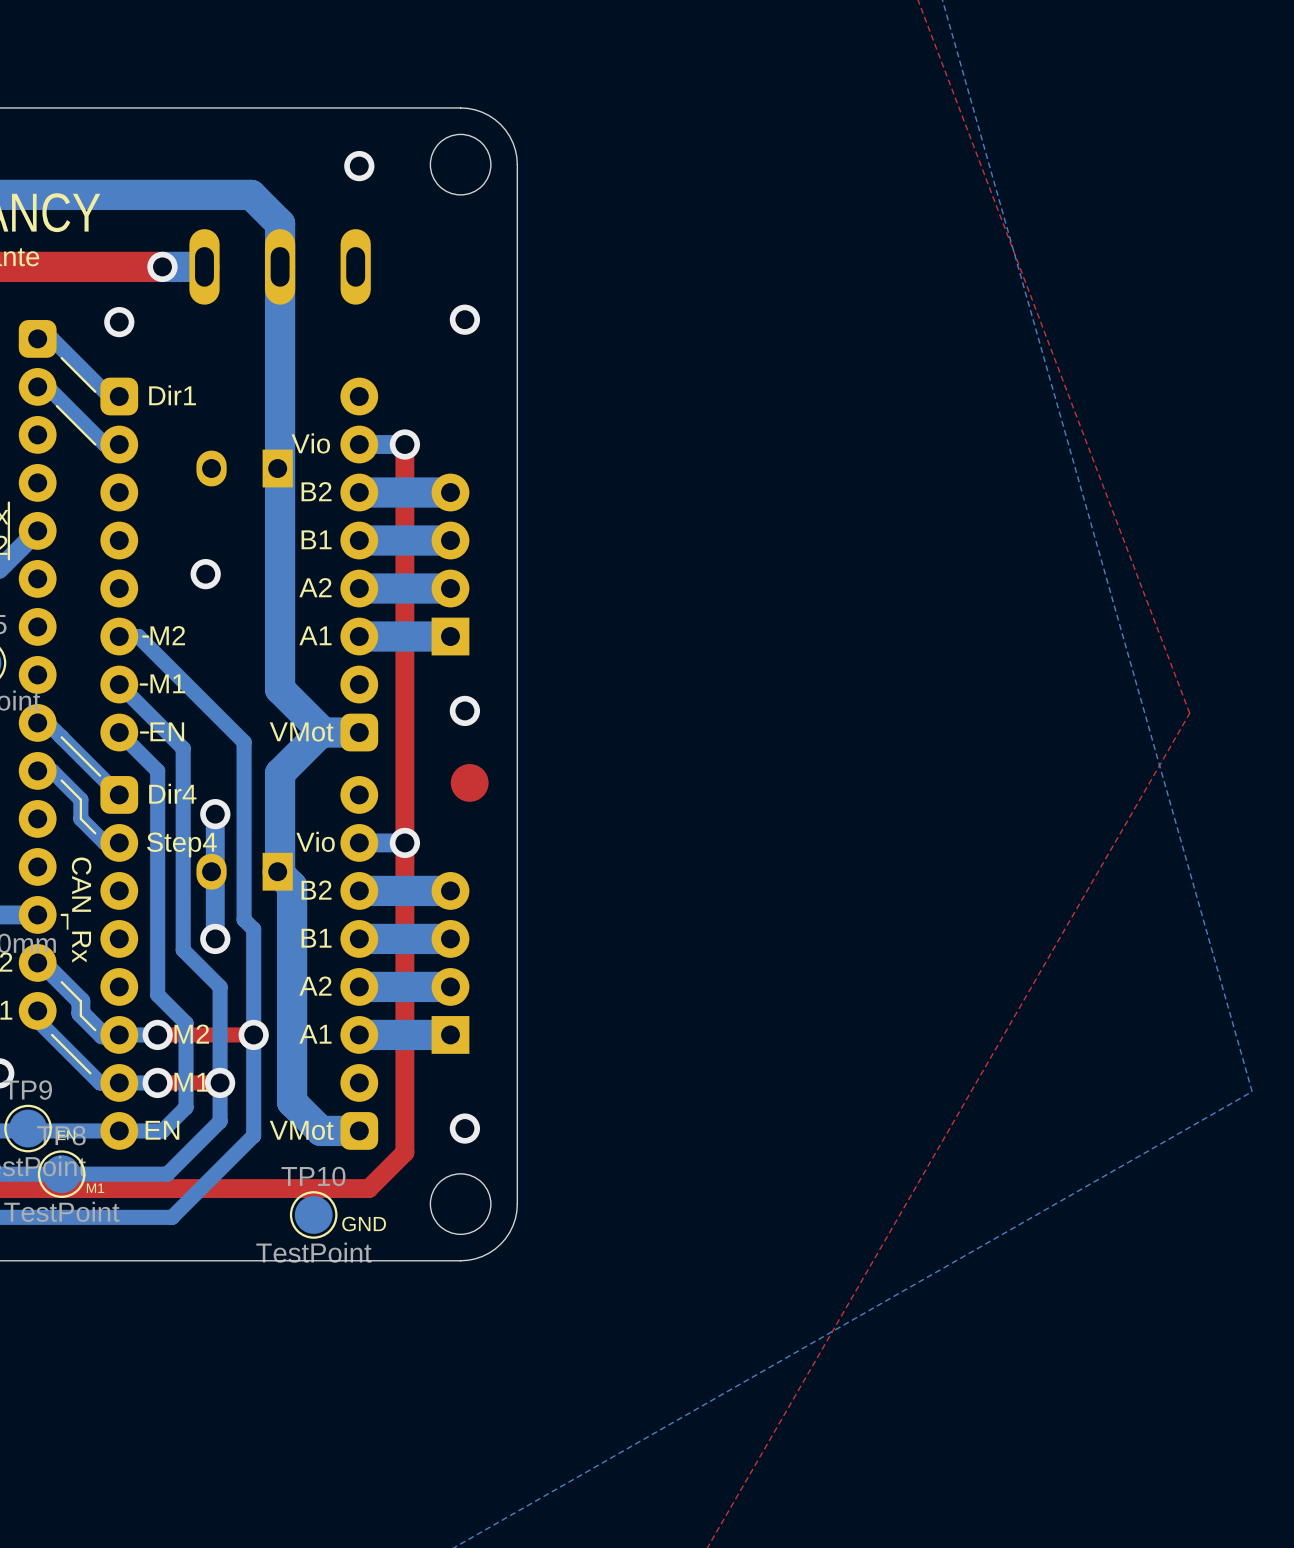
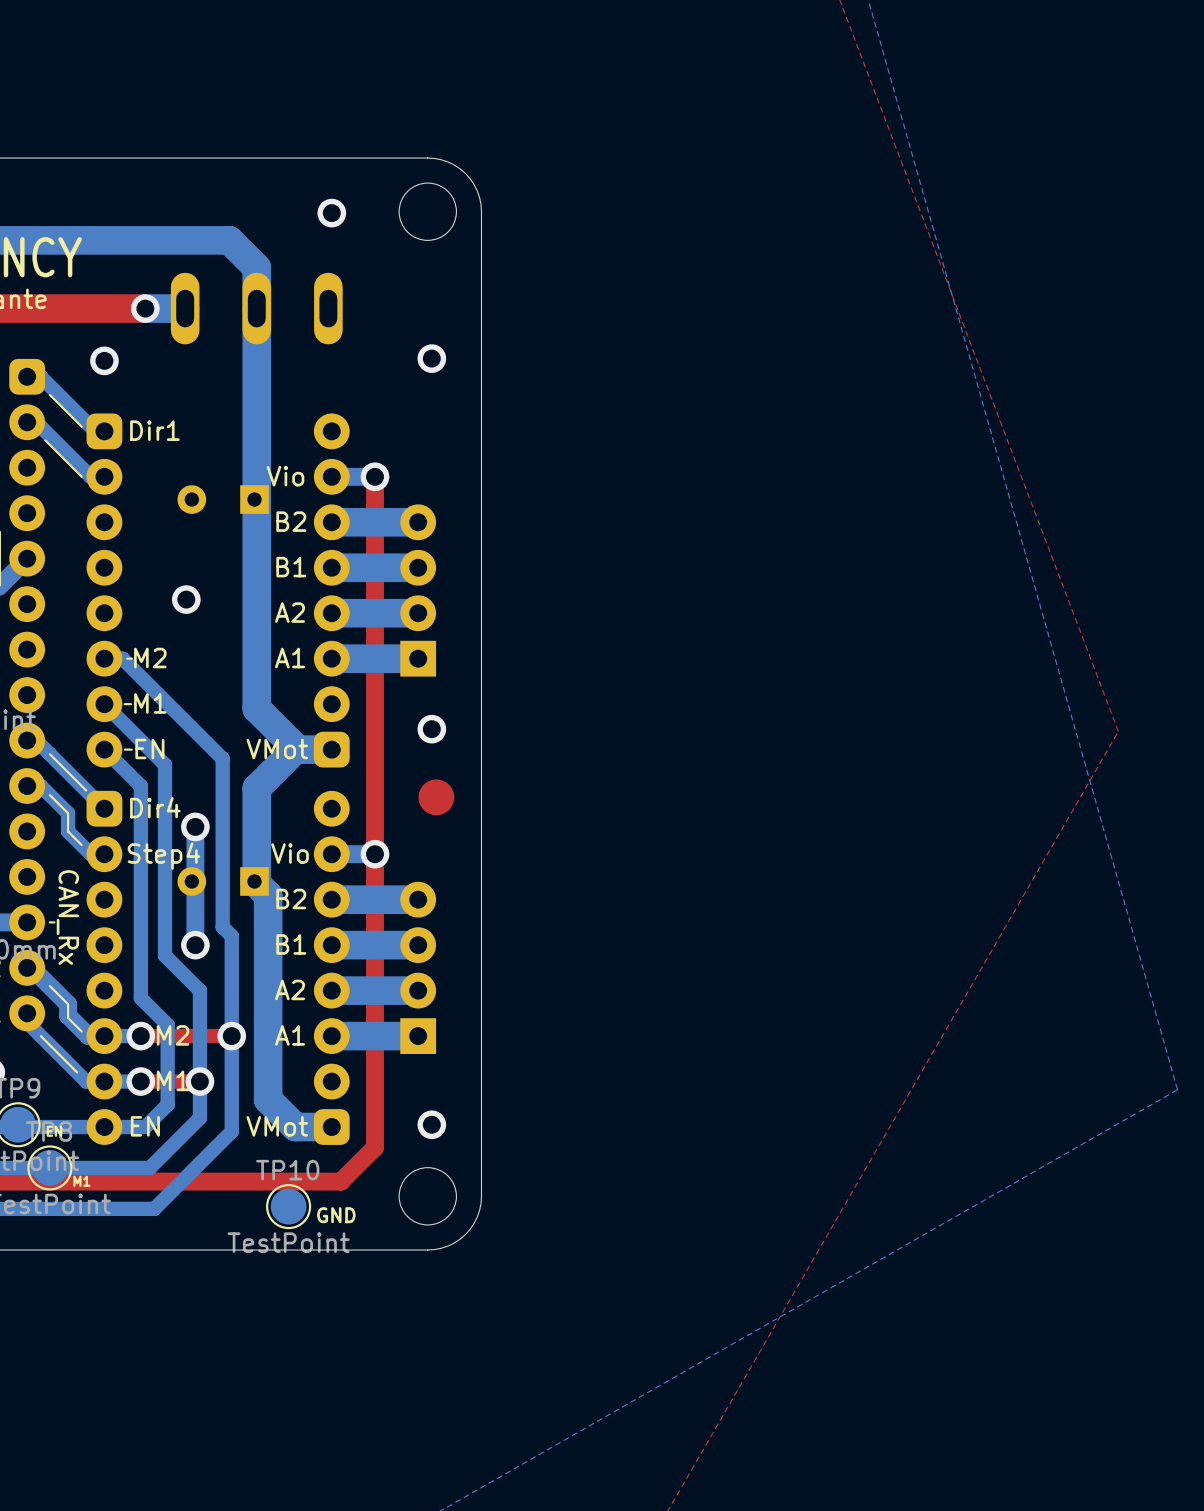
part footprint: [196, 449, 293, 488] -> [177, 485, 269, 514]
part footprint: [196, 852, 293, 891] -> [177, 867, 269, 896]

